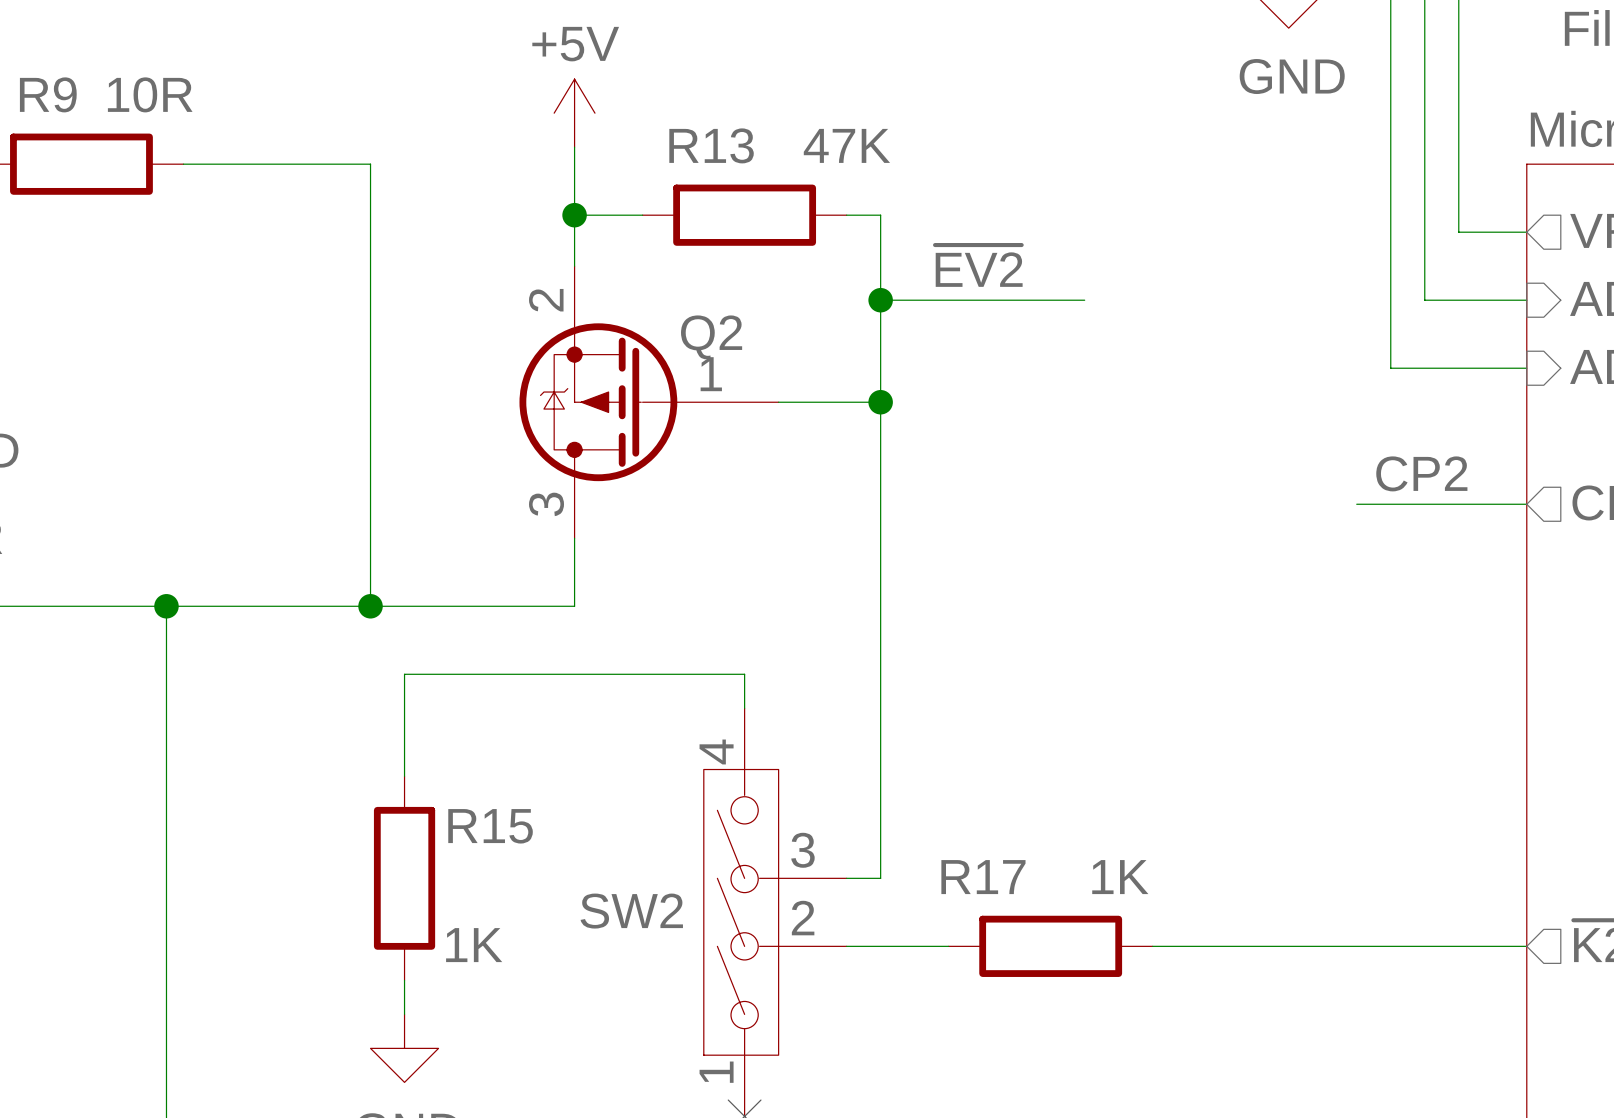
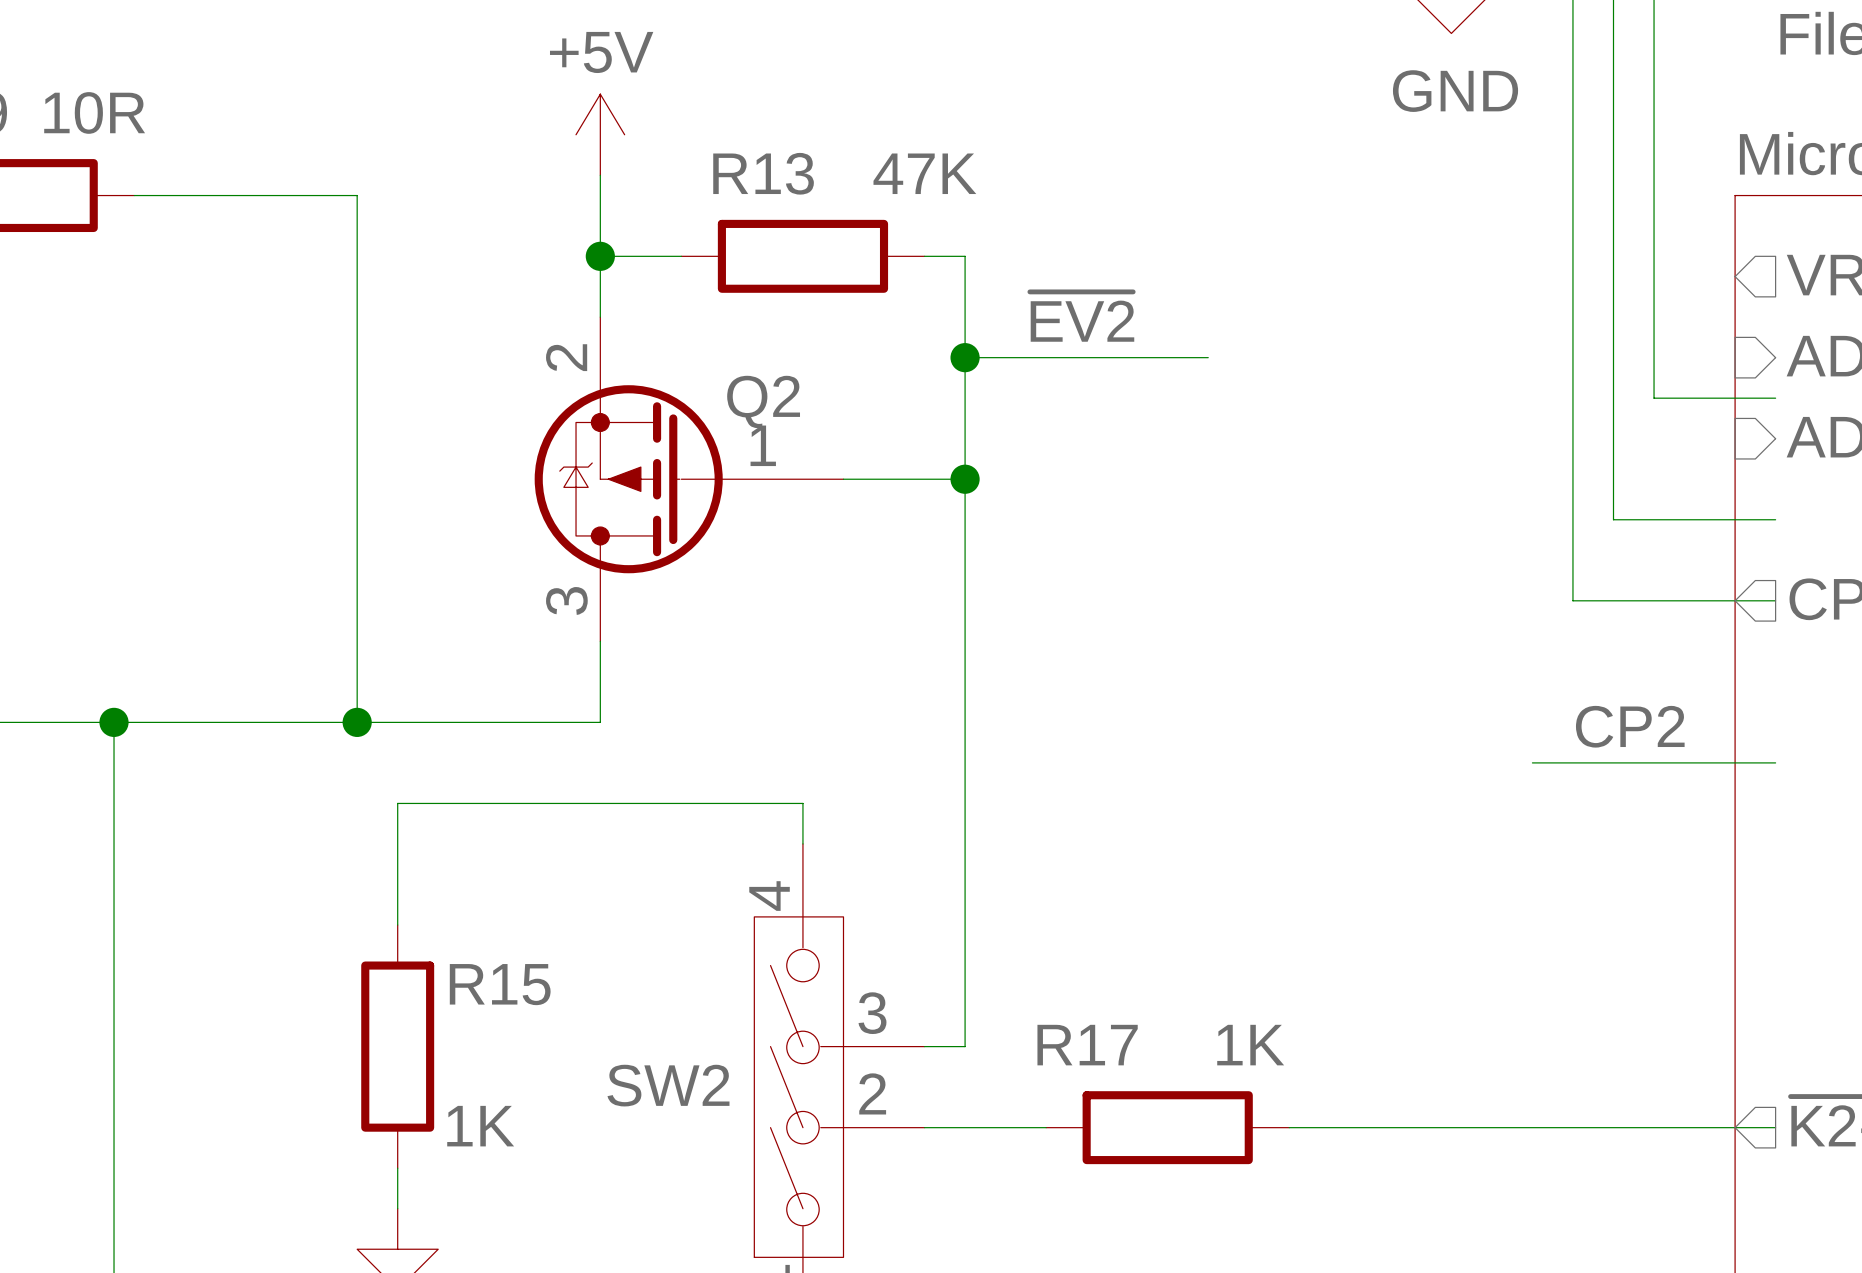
wire: (1458, 232) (1526, 232) -> (1654, 276) (1654, 398) (1775, 398)
wire: (1424, 300) (1526, 300) -> (1613, 357) (1613, 519) (1775, 519)
wire: (1390, 368) (1526, 368) -> none
label position: CP2 (1421, 473) -> CP2 (1630, 726)
wire: (1356, 504) (1390, 504) -> (1572, 438) (1572, 600)
wire: none -> (1735, 600) (1775, 600)
wire: none -> (1532, 762) (1775, 762)
wire: none -> (1735, 1127) (1775, 1127)

